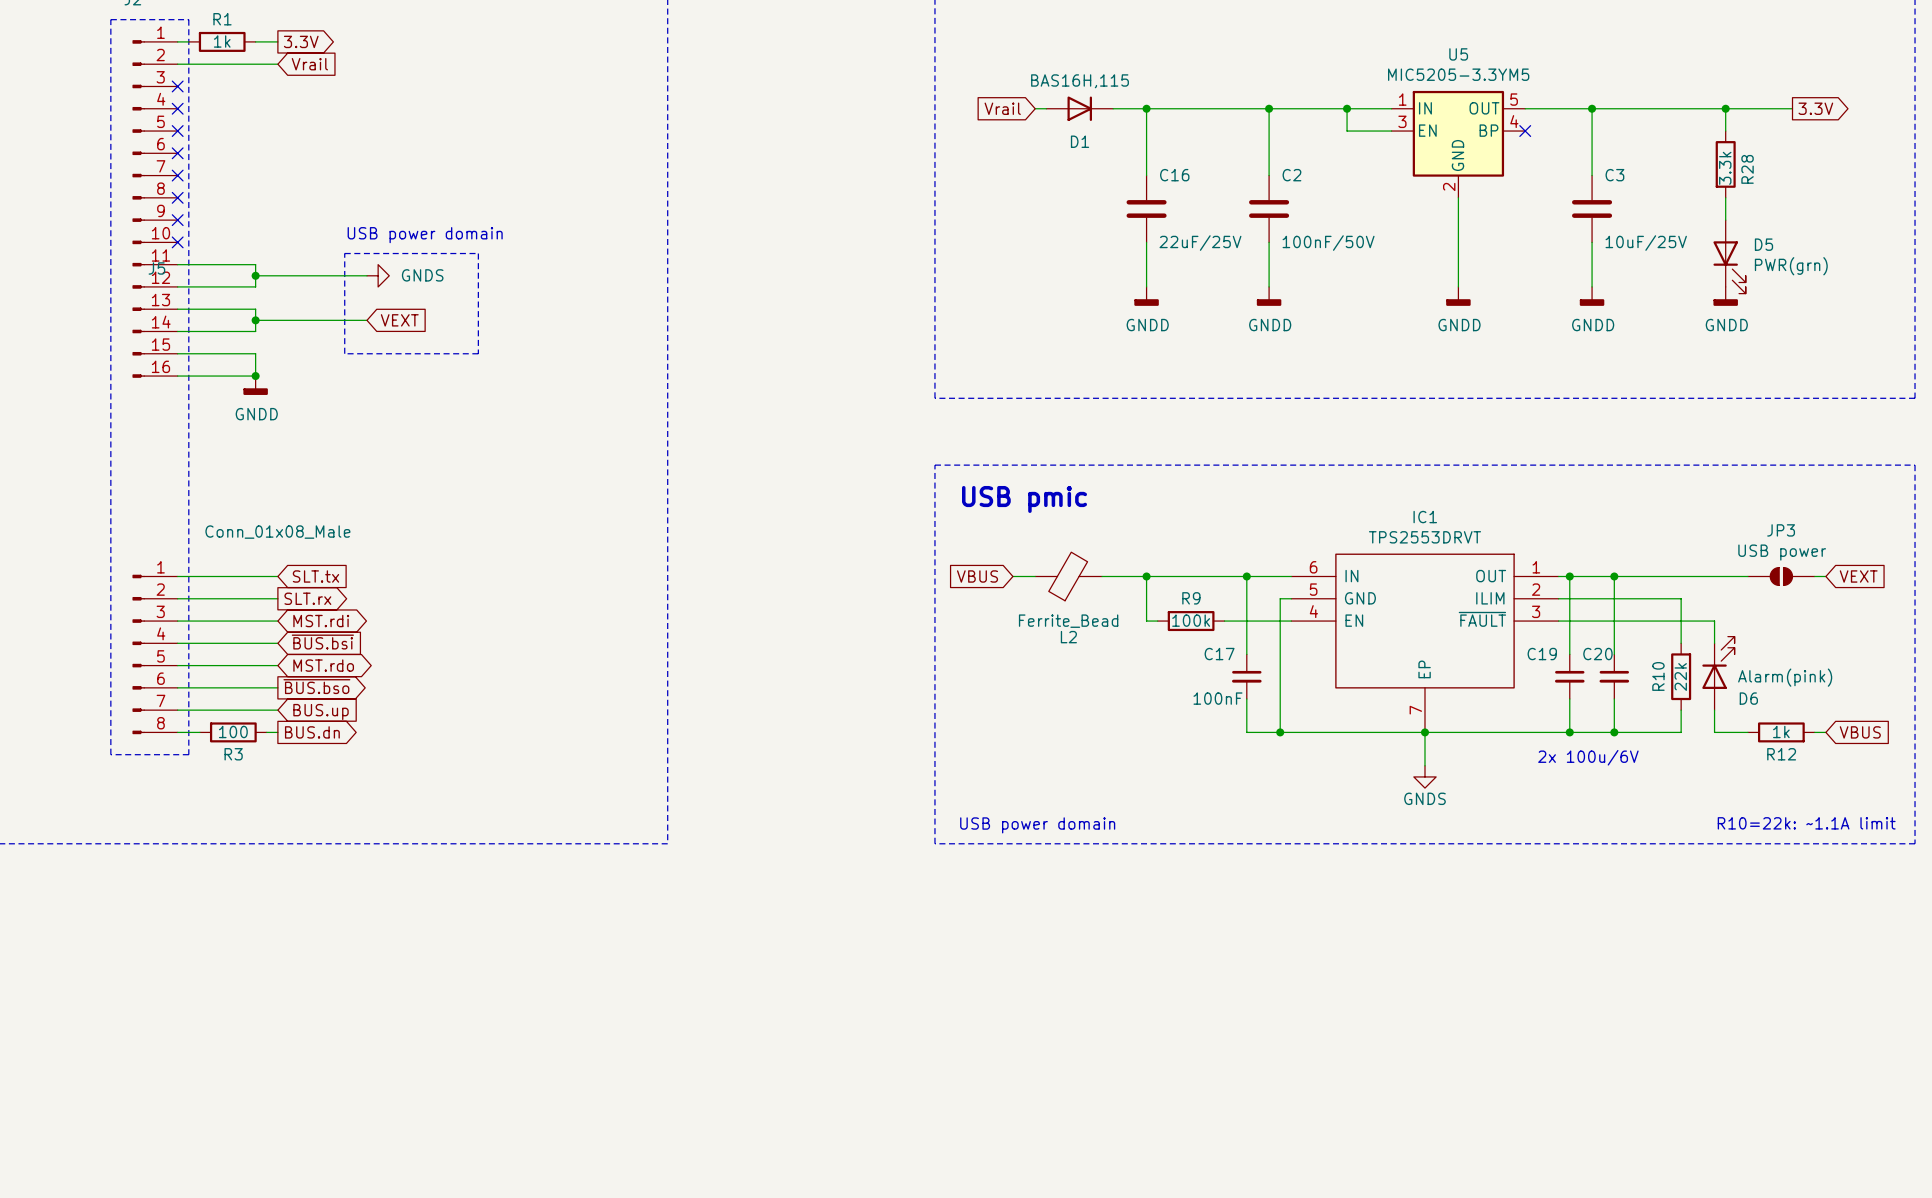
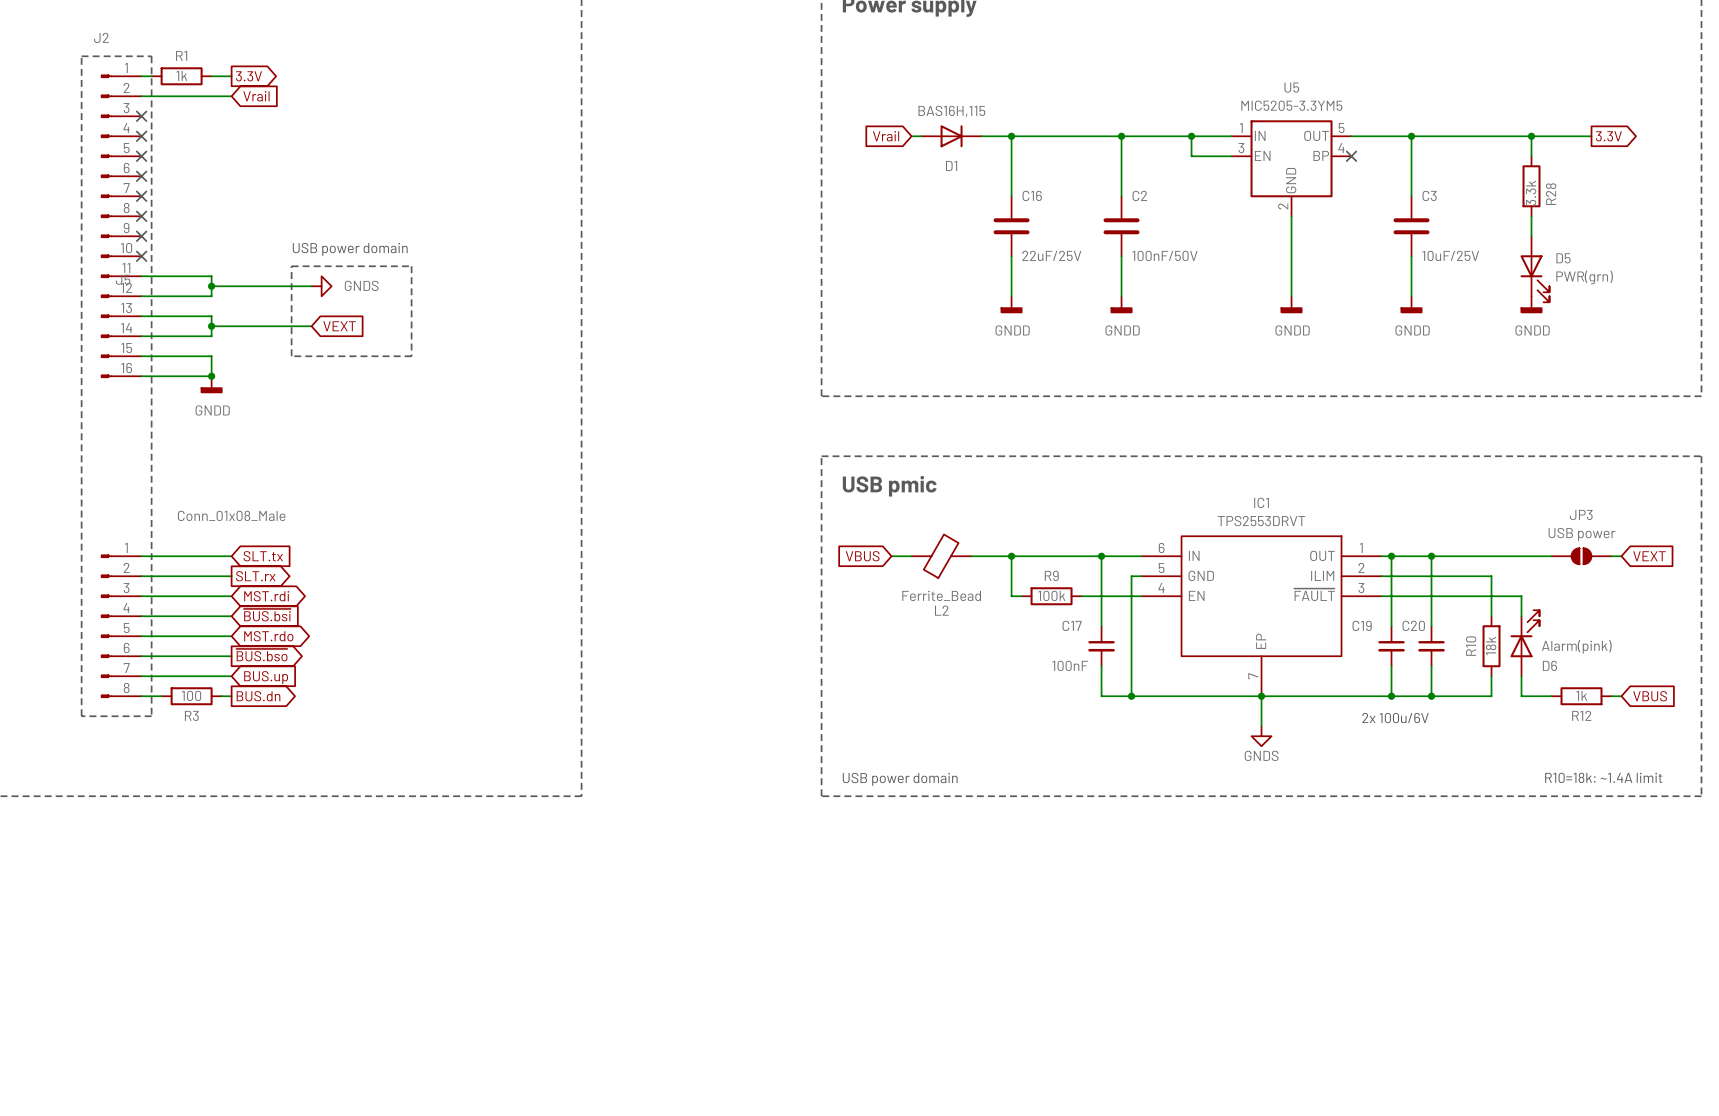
R10 value: 22k (1680, 676) -> 18k (1491, 646)
text: R10=22k: ~1.1A limit (1806, 823) -> R10=18k: ~1.4A limit (1603, 777)

